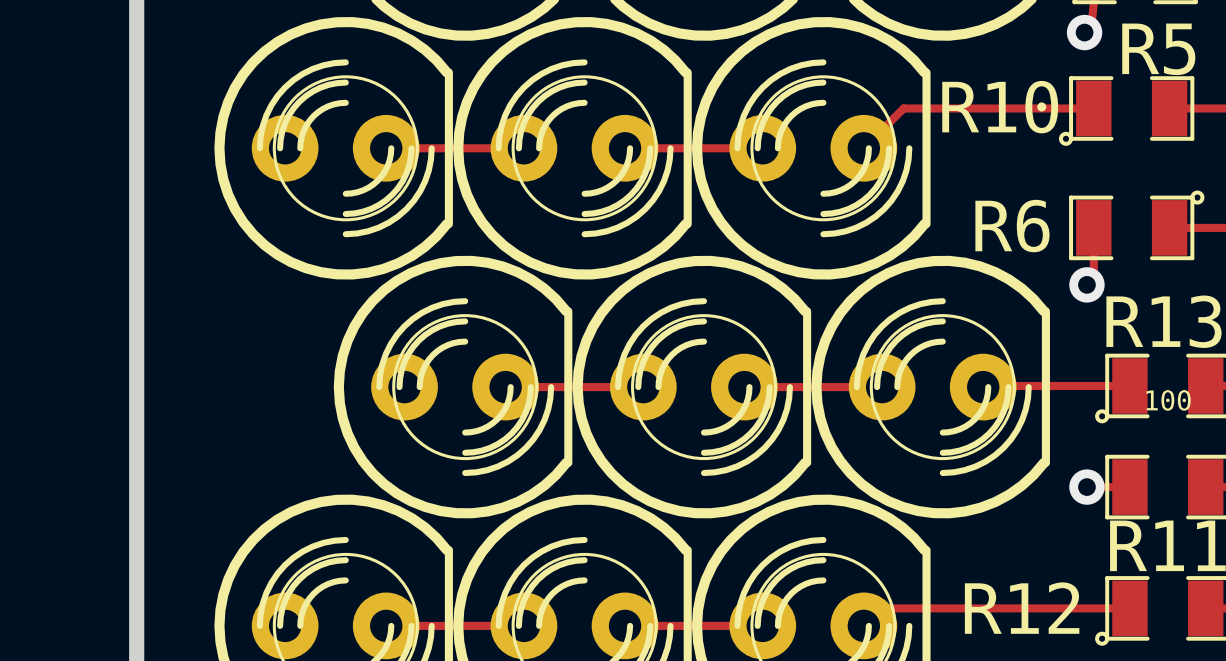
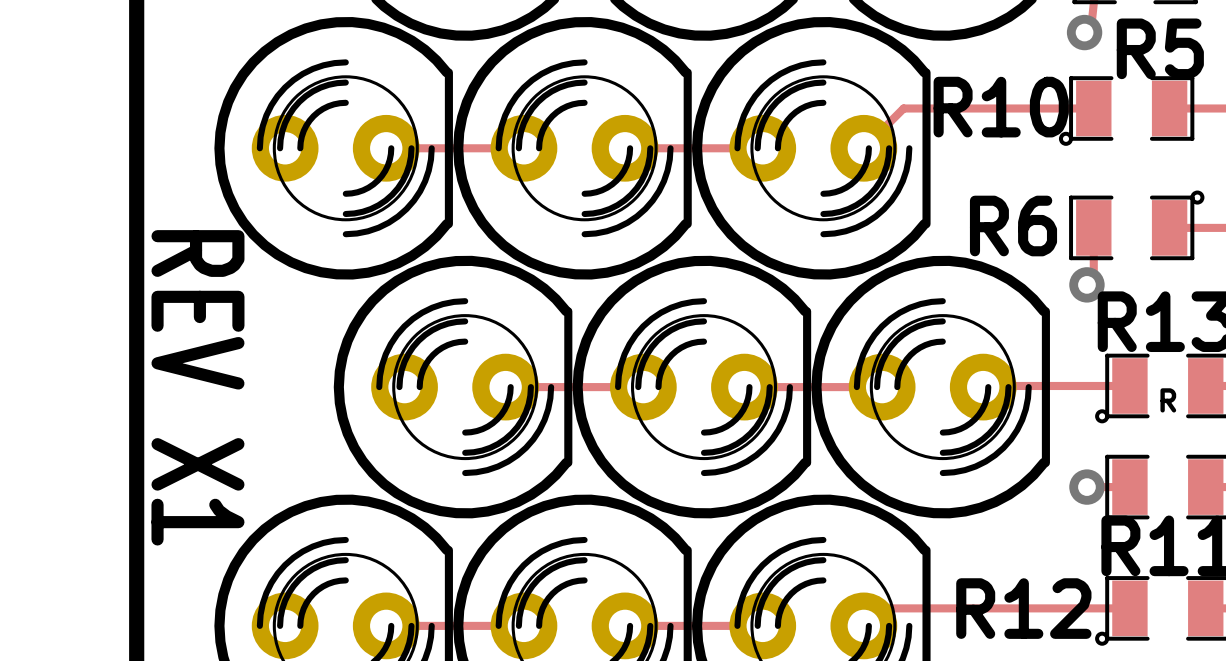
text: none -> REV X1 (197, 387)
R13 value: 100 (1168, 400) -> R (1168, 400)

